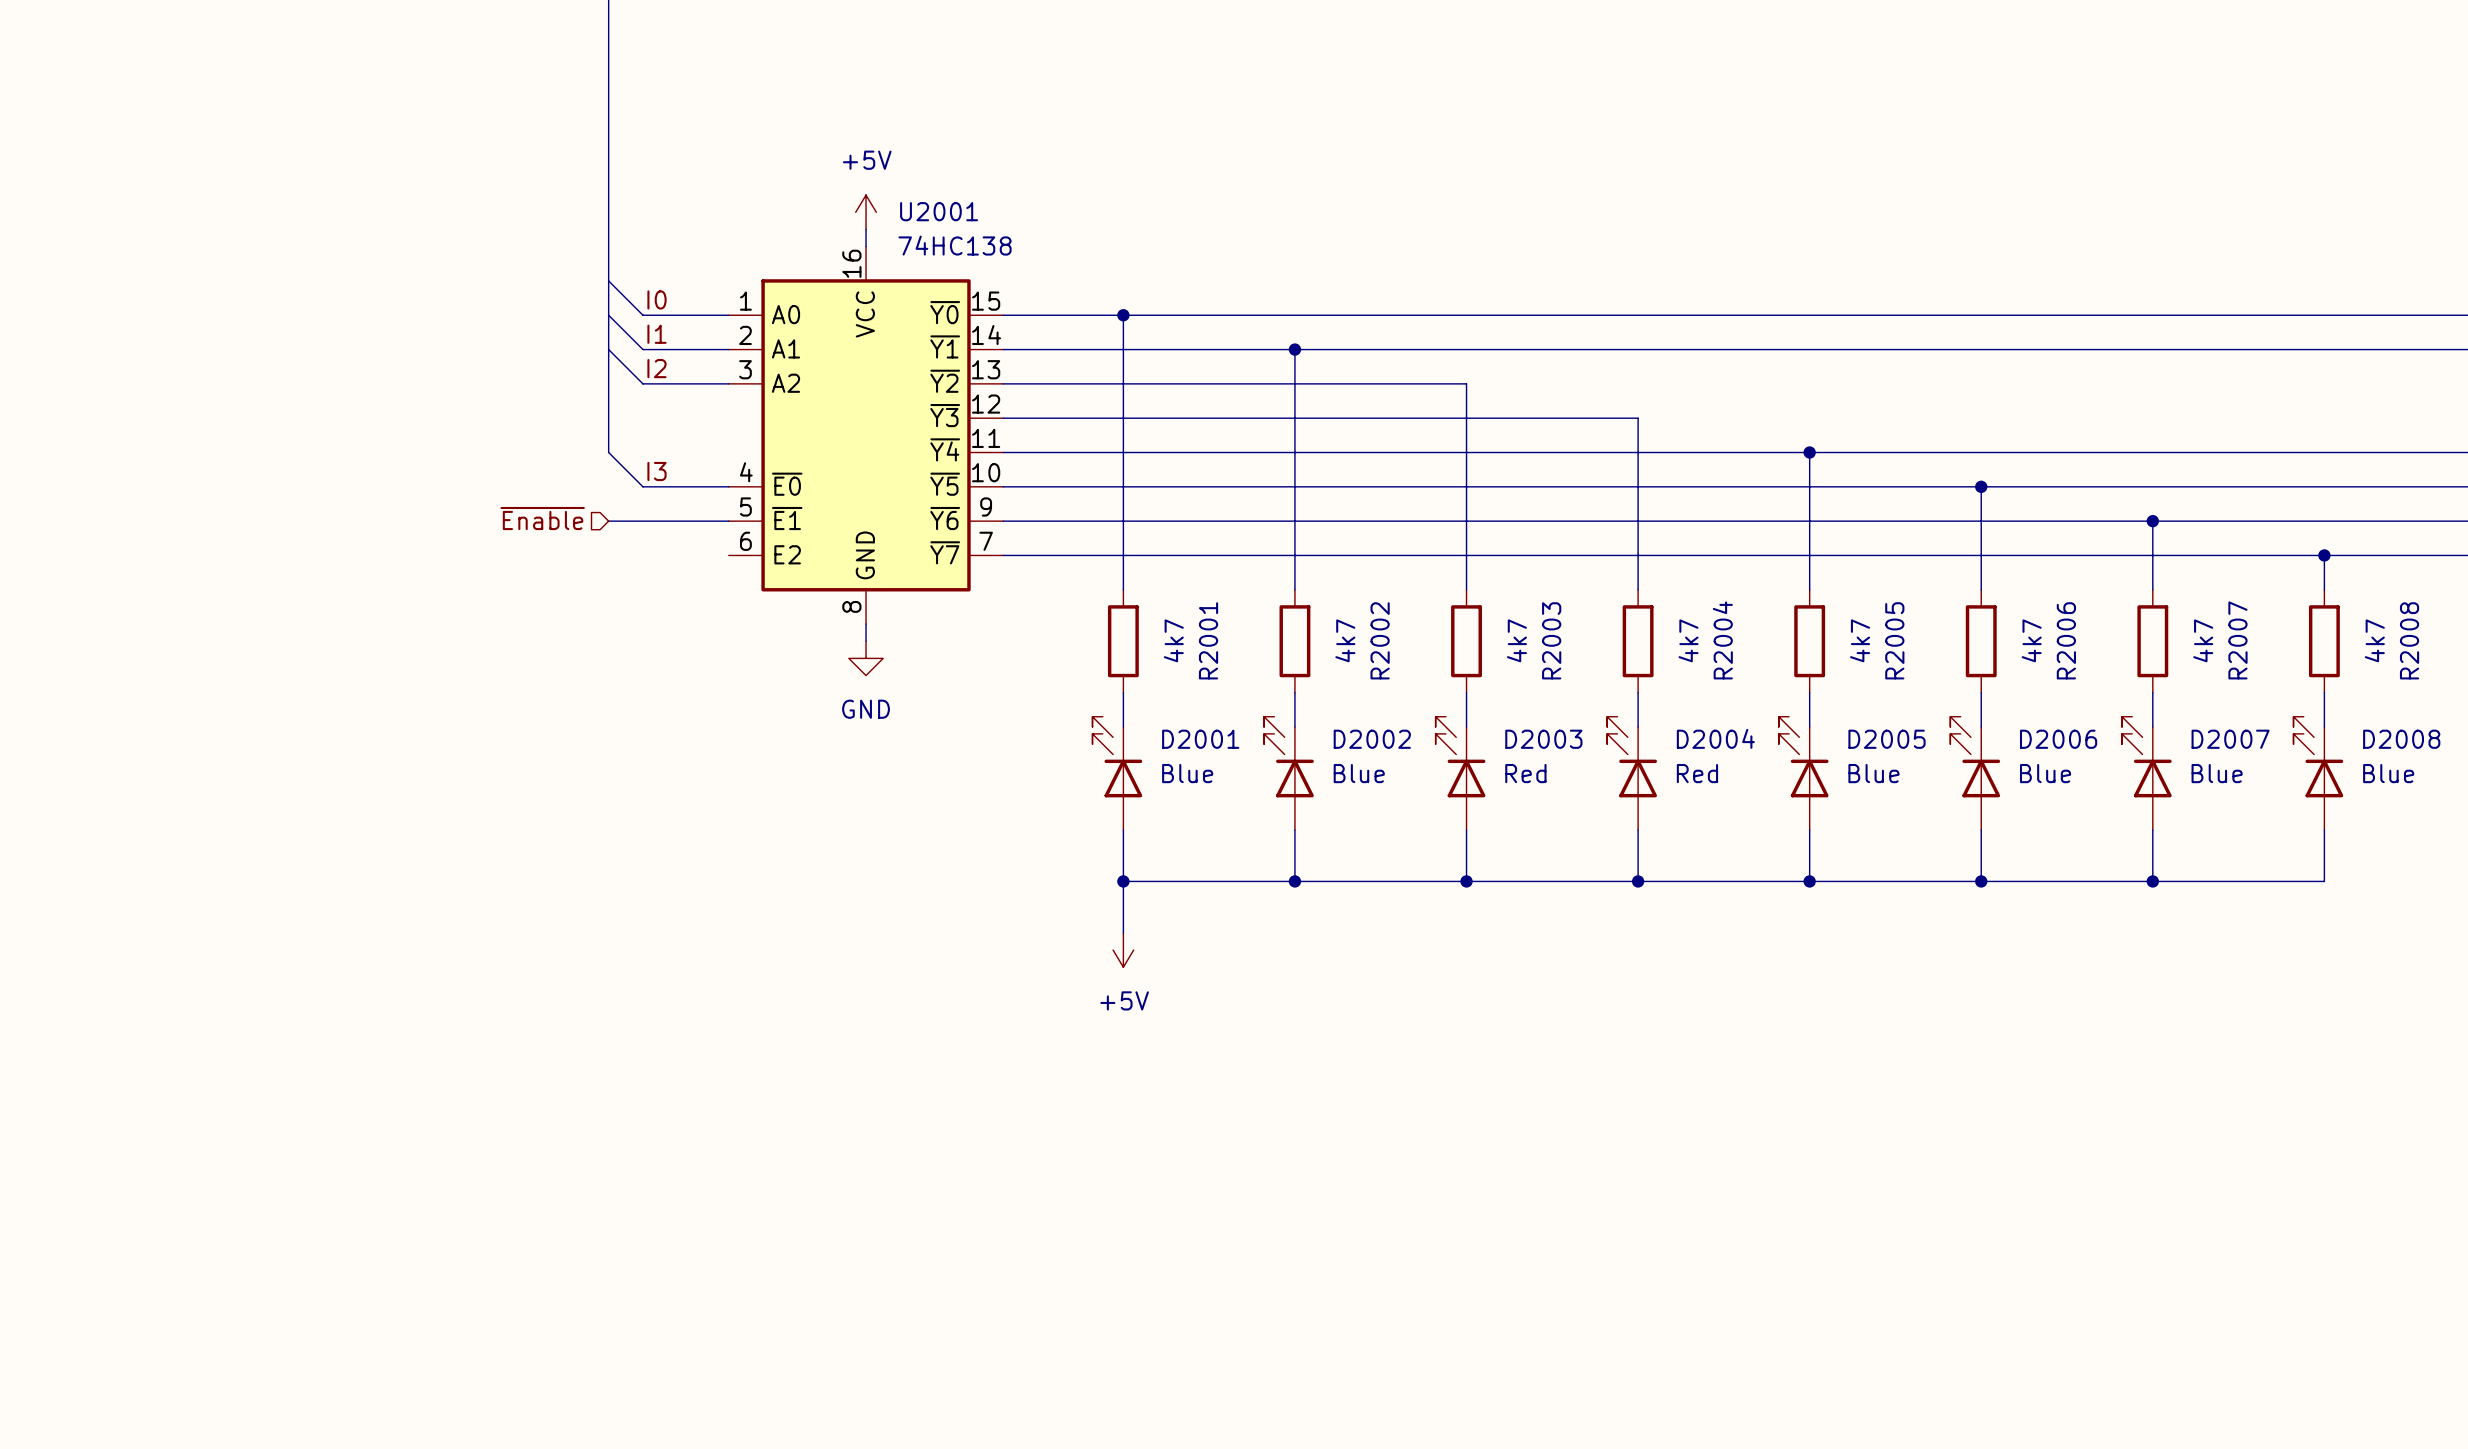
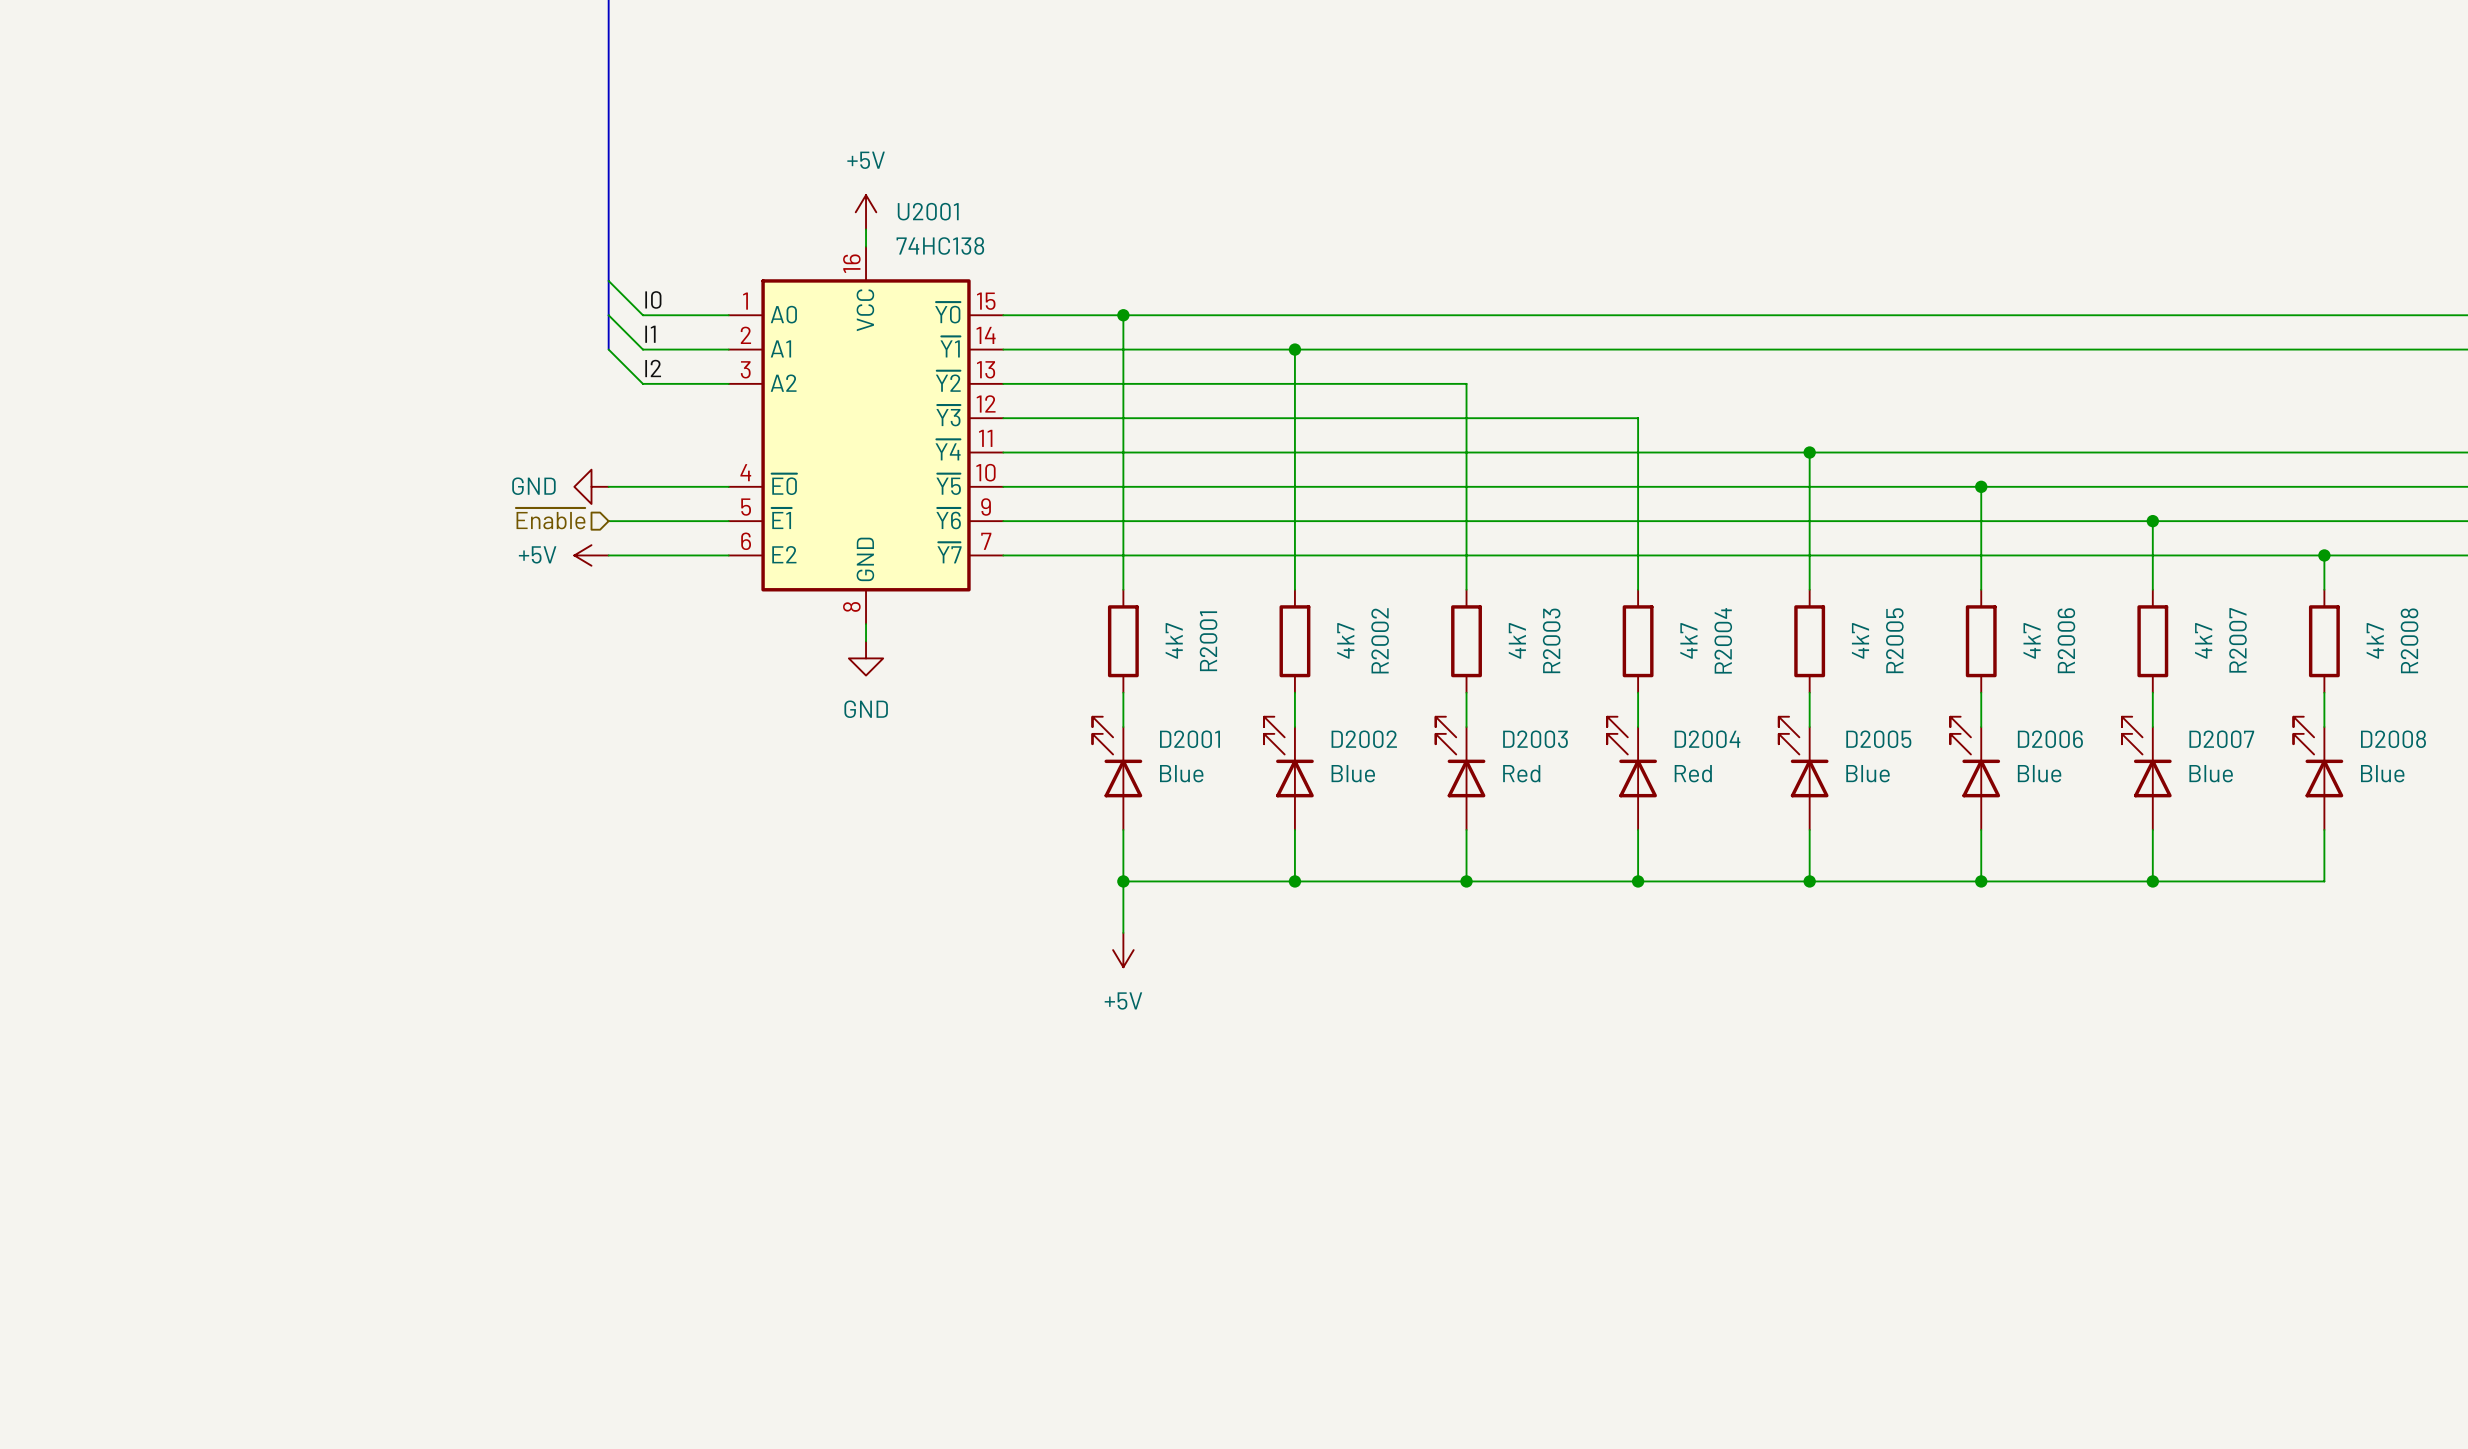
bus: (608, 349) (608, 452) -> none
wire: (608, 452) (642, 486) -> (608, 486) (642, 486)
label: I3 (656, 471) -> none
power symbol: none -> GND (591, 486)
power symbol: none -> +5V (591, 555)
wire: none -> (608, 555) (728, 555)

